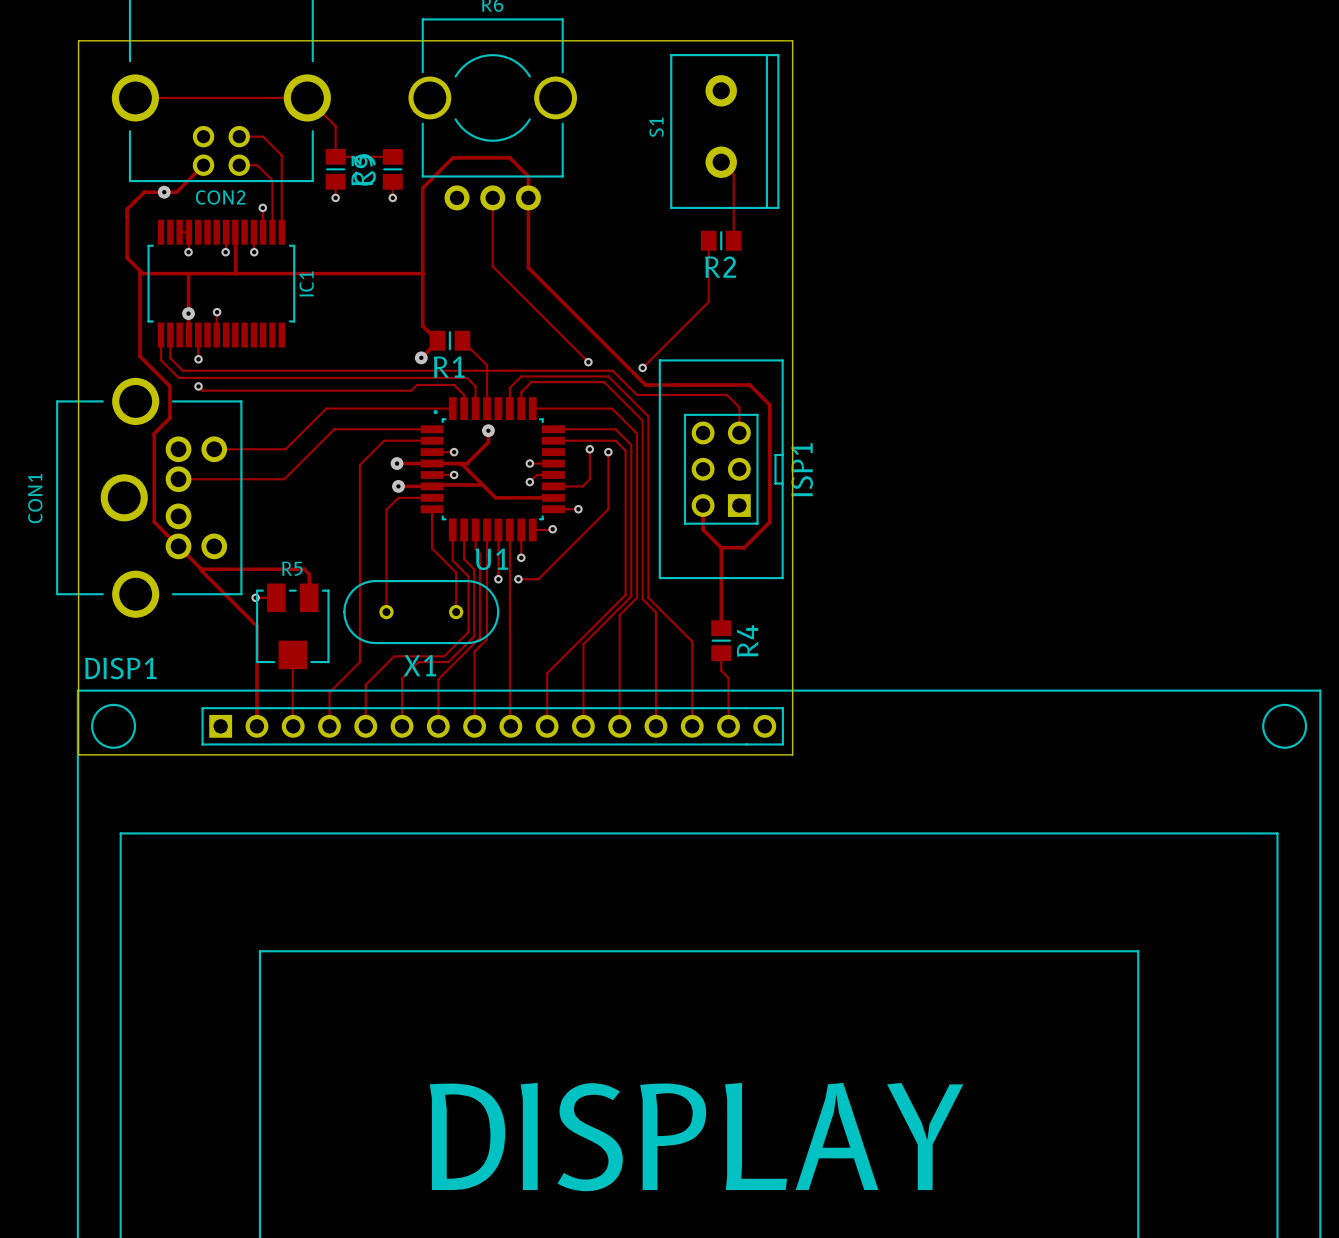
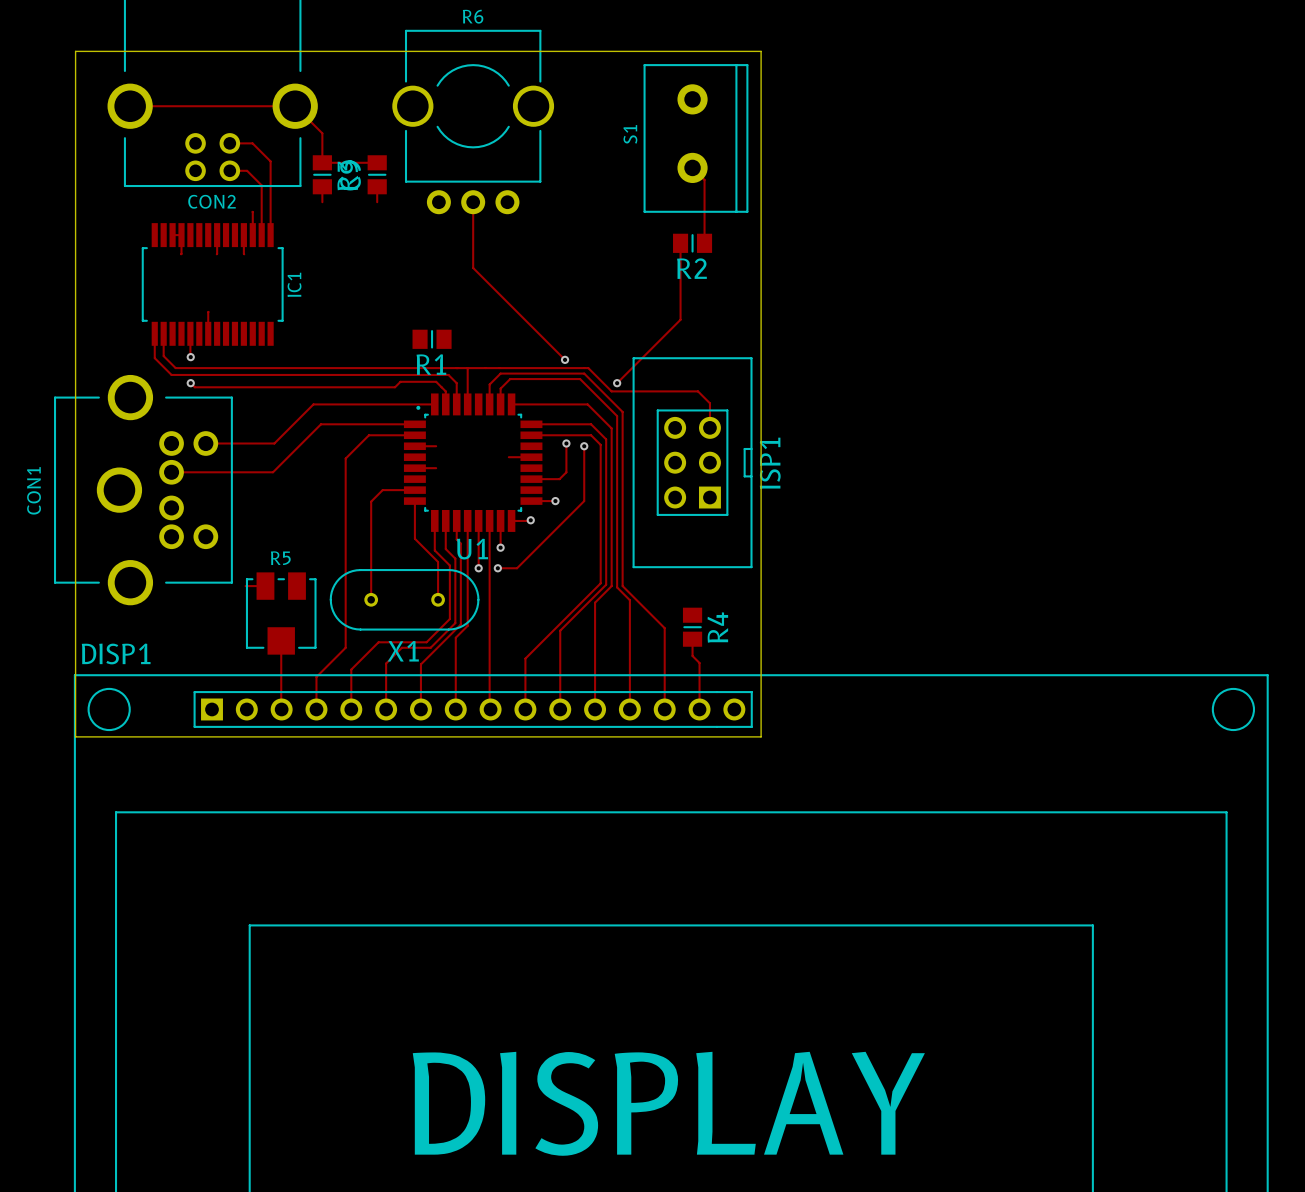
track: (203, 165) (176, 192) (144, 192) (127, 209) (127, 257) (142, 273) (422, 273) -> none
via: (164, 192) -> none
via: (335, 197) -> none
via: (392, 197) -> none
via: (262, 207) -> none
track: (235, 232) (235, 273) -> none
via: (188, 252) -> none
via: (225, 252) -> none
via: (254, 252) -> none
track: (139, 270) (139, 356) (169, 386) (169, 417) (154, 433) (154, 522) (201, 569) -> none
track: (188, 273) (188, 335) -> none
track: (708, 301) (642, 367) -> (680, 301) (680, 319) (617, 383)
via: (217, 312) -> none
via: (188, 313) -> none
track: (462, 340) (487, 365) (487, 370) -> none
track: (421, 357) (437, 341) (422, 326) (422, 187) (452, 157) (509, 157) (528, 176) (528, 267) (645, 385) (749, 385) (769, 405) (769, 522) (744, 547) (721, 547) -> none
via: (421, 357) -> none
via position: (642, 367) -> (617, 383)
track: (488, 430) (488, 442) (467, 463) (397, 463) -> none
via: (488, 430) -> none
via: (454, 452) -> none
via: (397, 463) -> none
track: (461, 463) (495, 497) (553, 497) -> none
via: (529, 463) -> none
via: (454, 474) -> none
track: (553, 474) (537, 474) (529, 482) -> none
via: (529, 482) -> none
track: (482, 484) (398, 486) -> none
via: (398, 486) -> none
track: (703, 505) (703, 529) (721, 547) -> none
track: (721, 547) (721, 628) -> none
track: (201, 569) (256, 626) (256, 726) -> none
track: (201, 569) (304, 569) (309, 574) (309, 597) -> none
via: (255, 597) -> none

